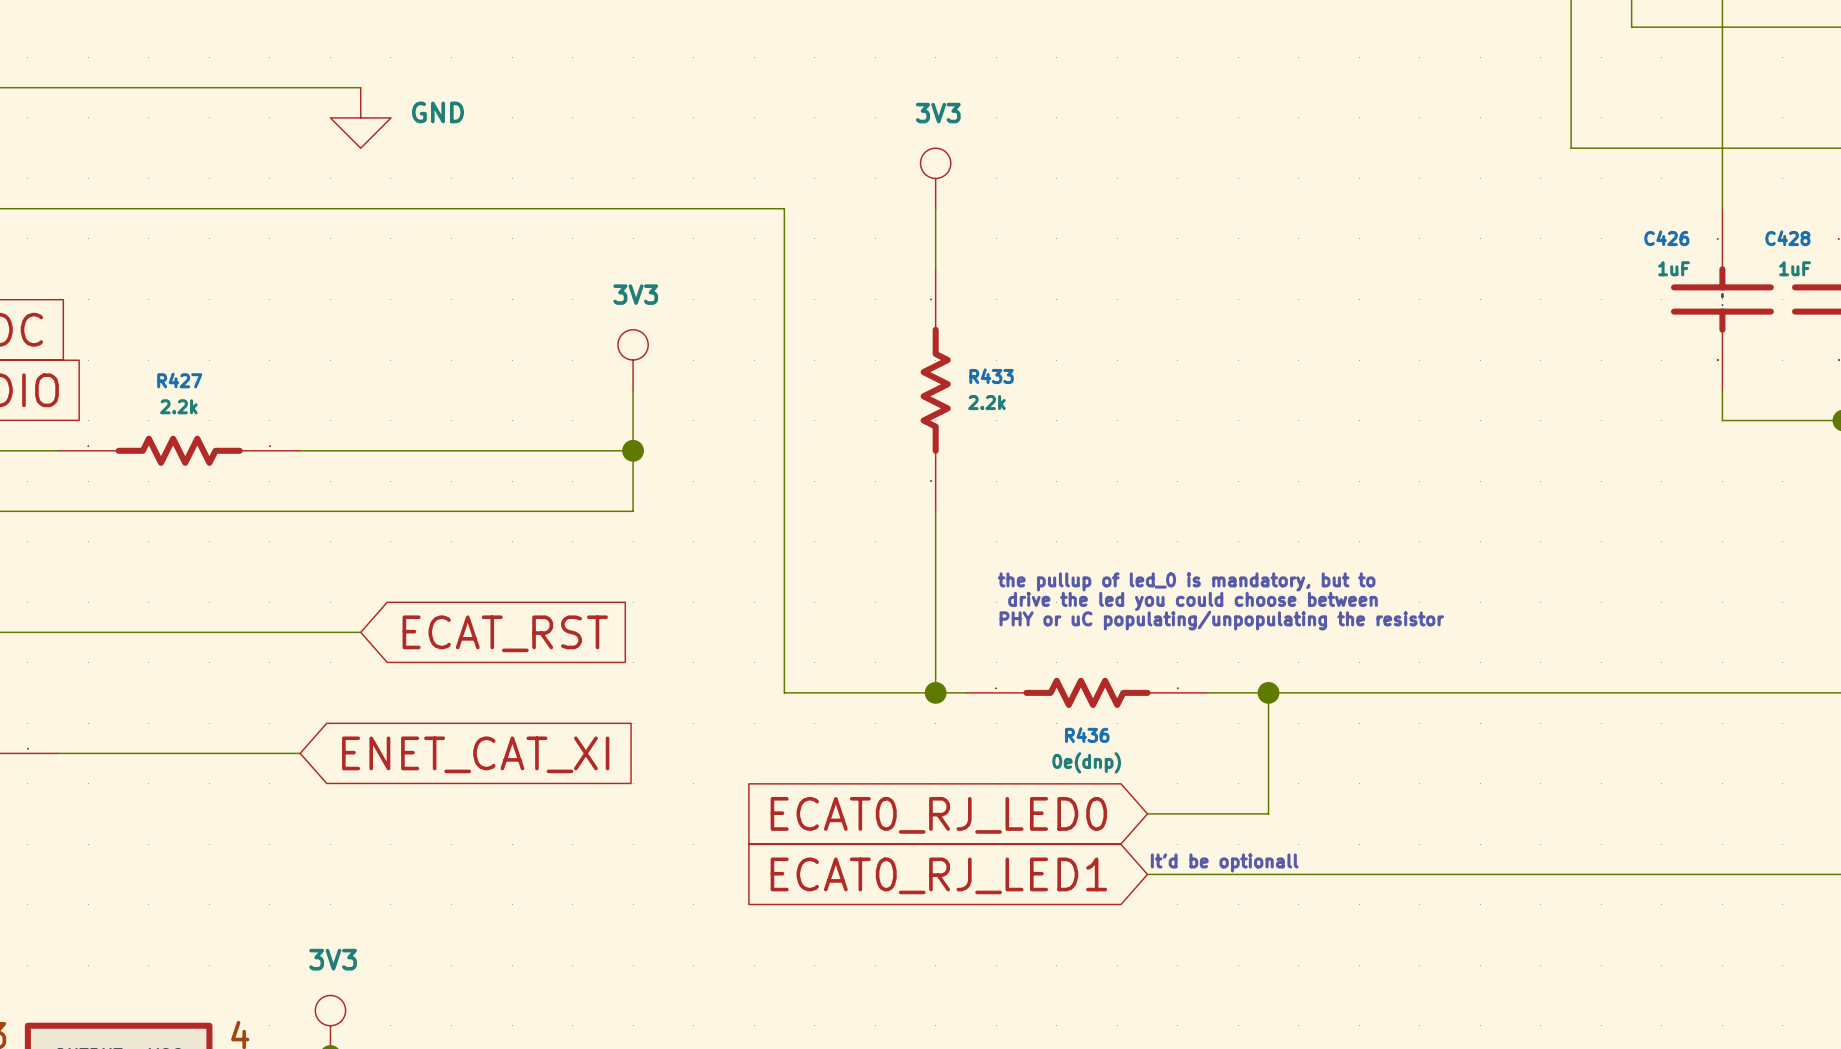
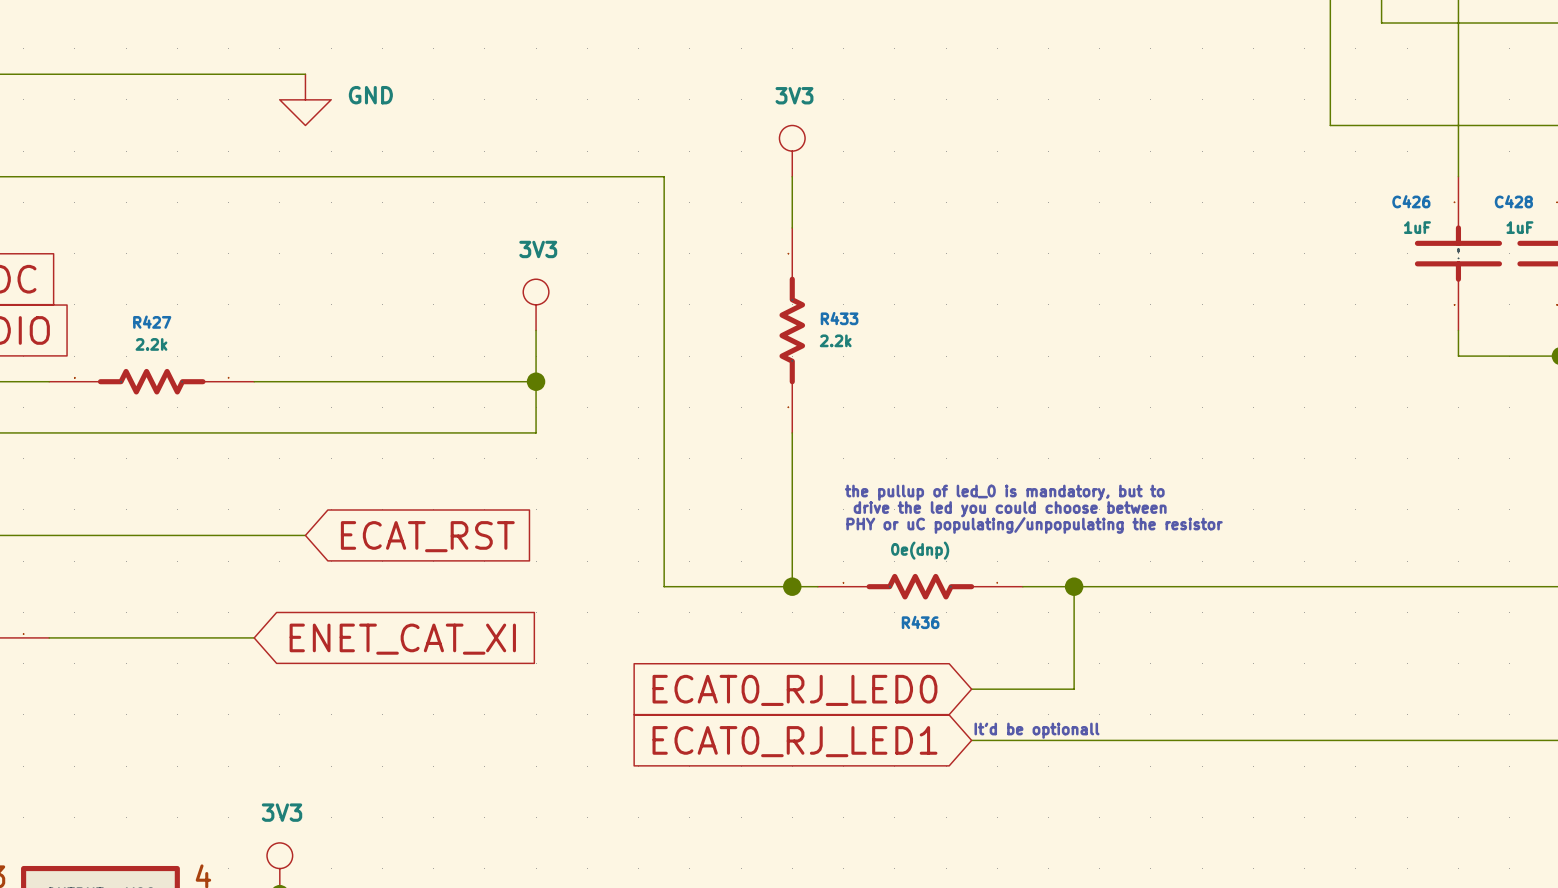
R436 value position: 0e(dnp) (1086, 762) -> 0e(dnp) (920, 550)

